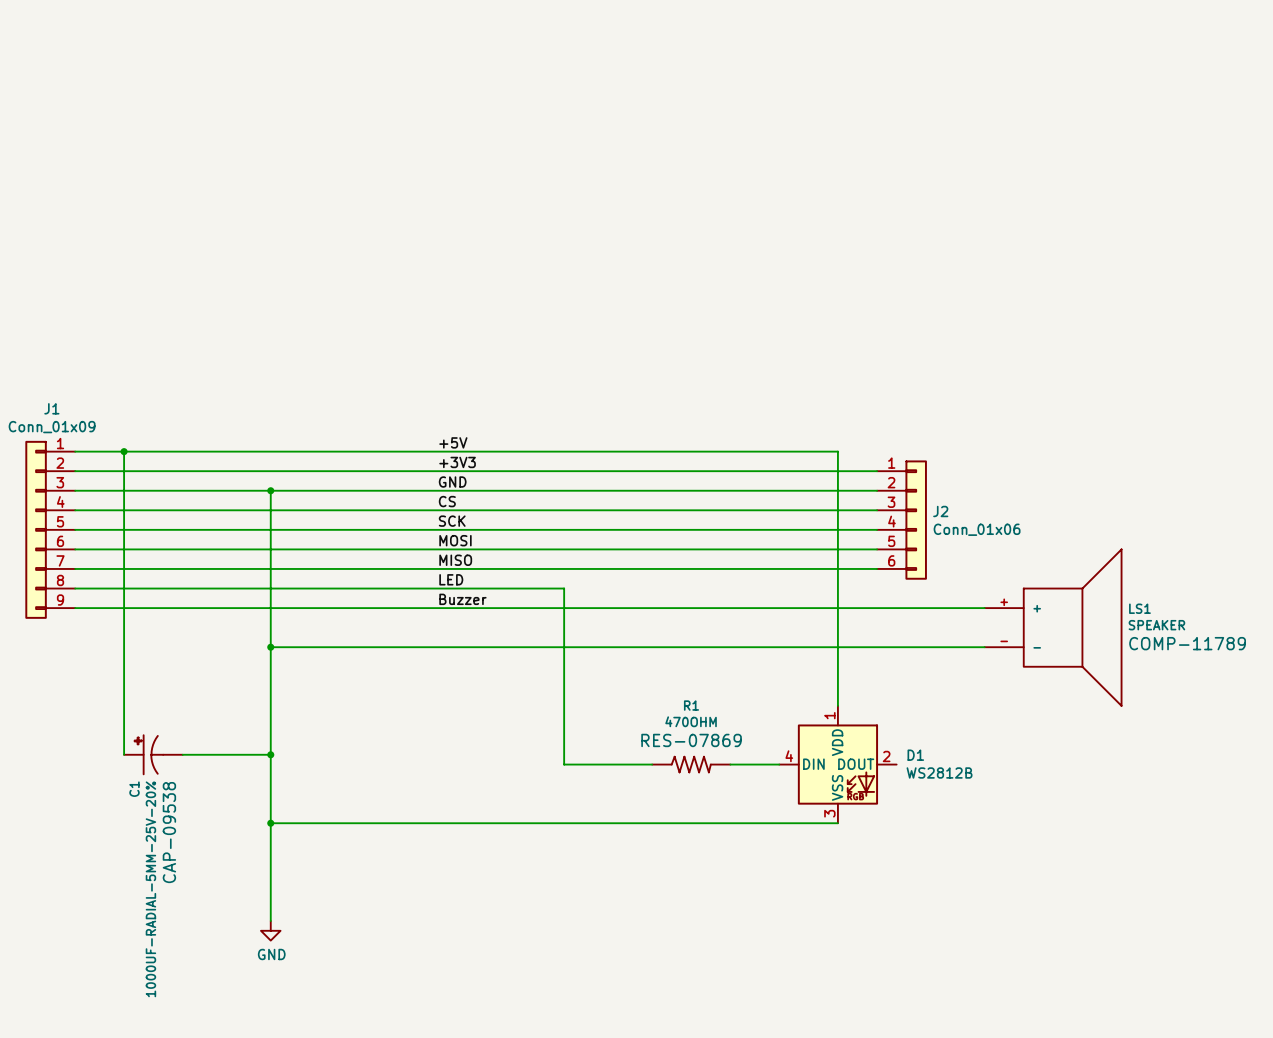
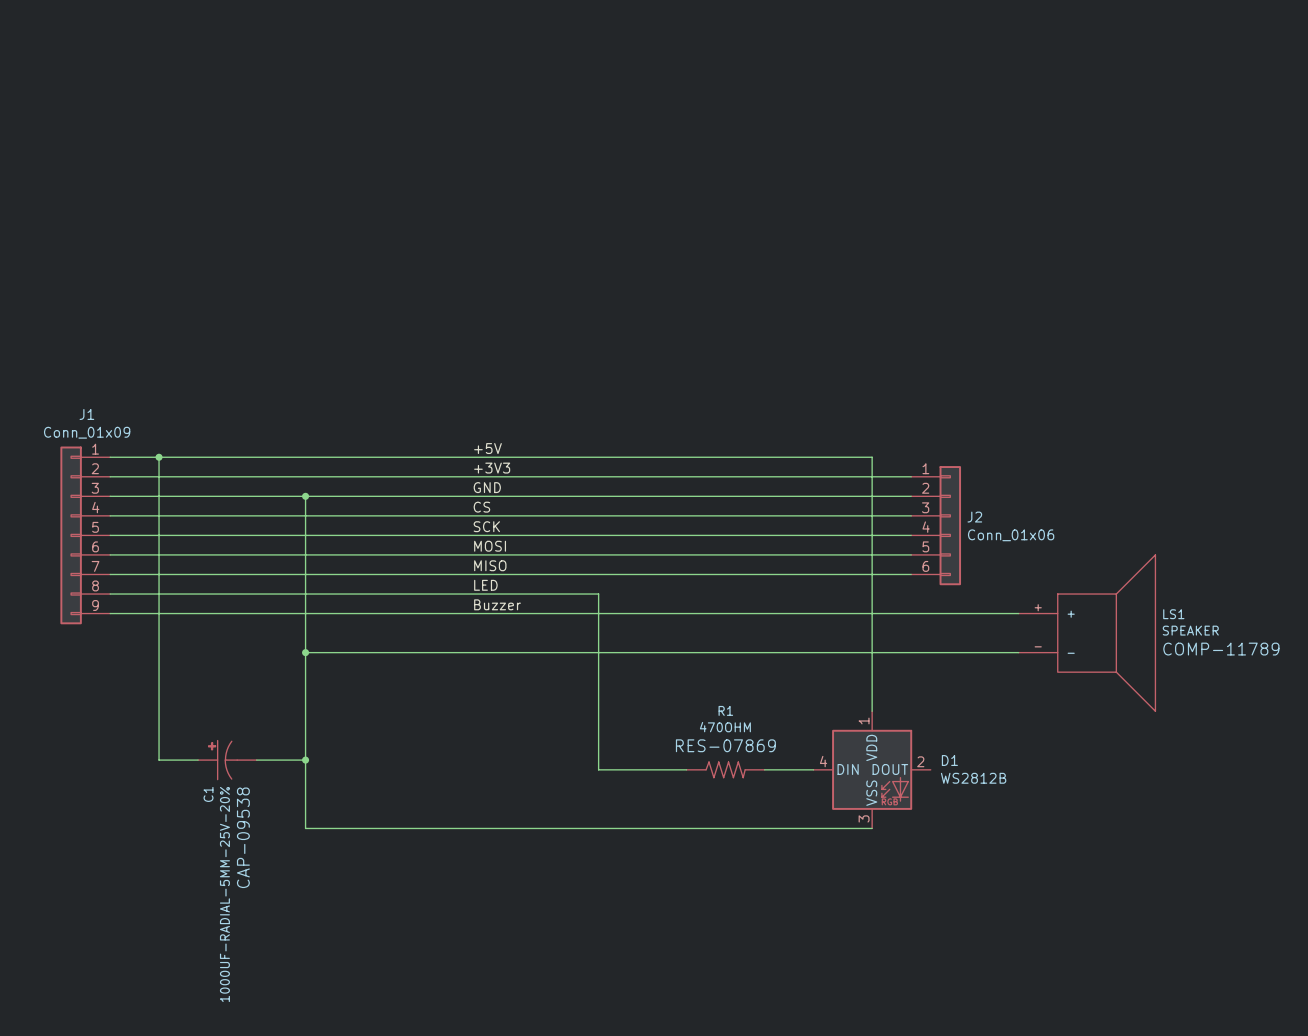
C1 position: (153, 754) -> (227, 760)
wire: (270, 823) (270, 921) -> none
junction: (270, 823) -> none
power symbol: GND (270, 930) -> none

